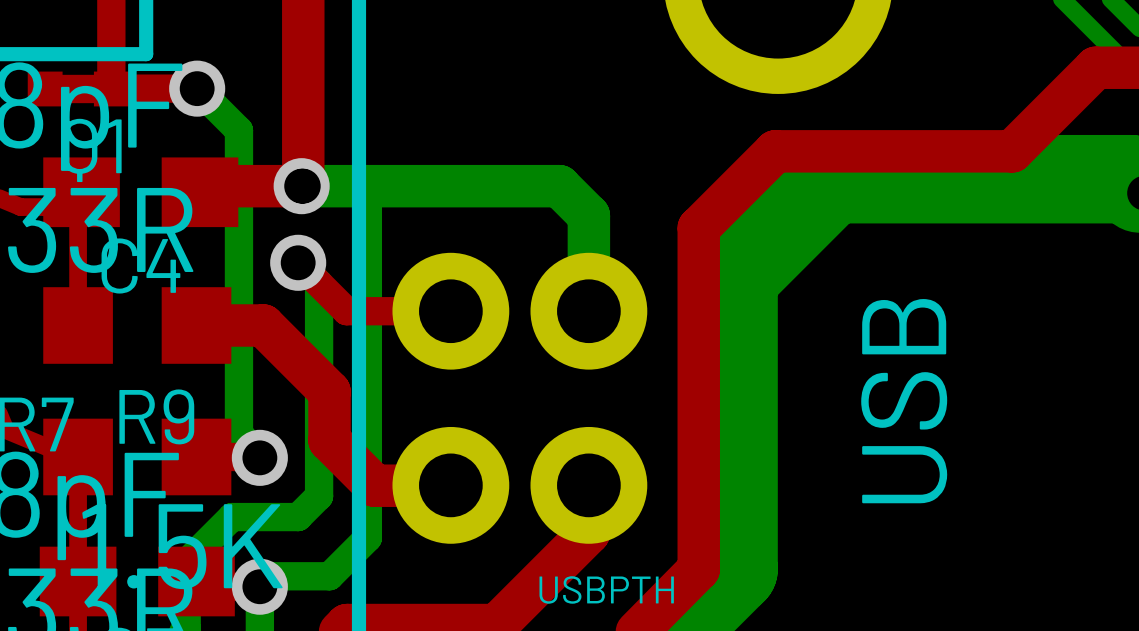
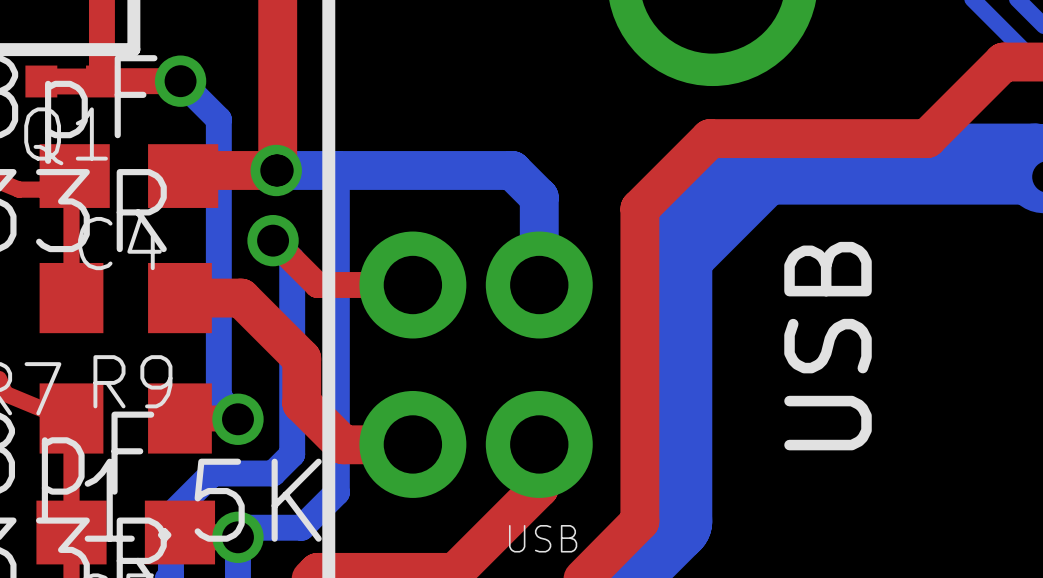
part value: USBPTH (606, 589) -> USB (543, 538)

